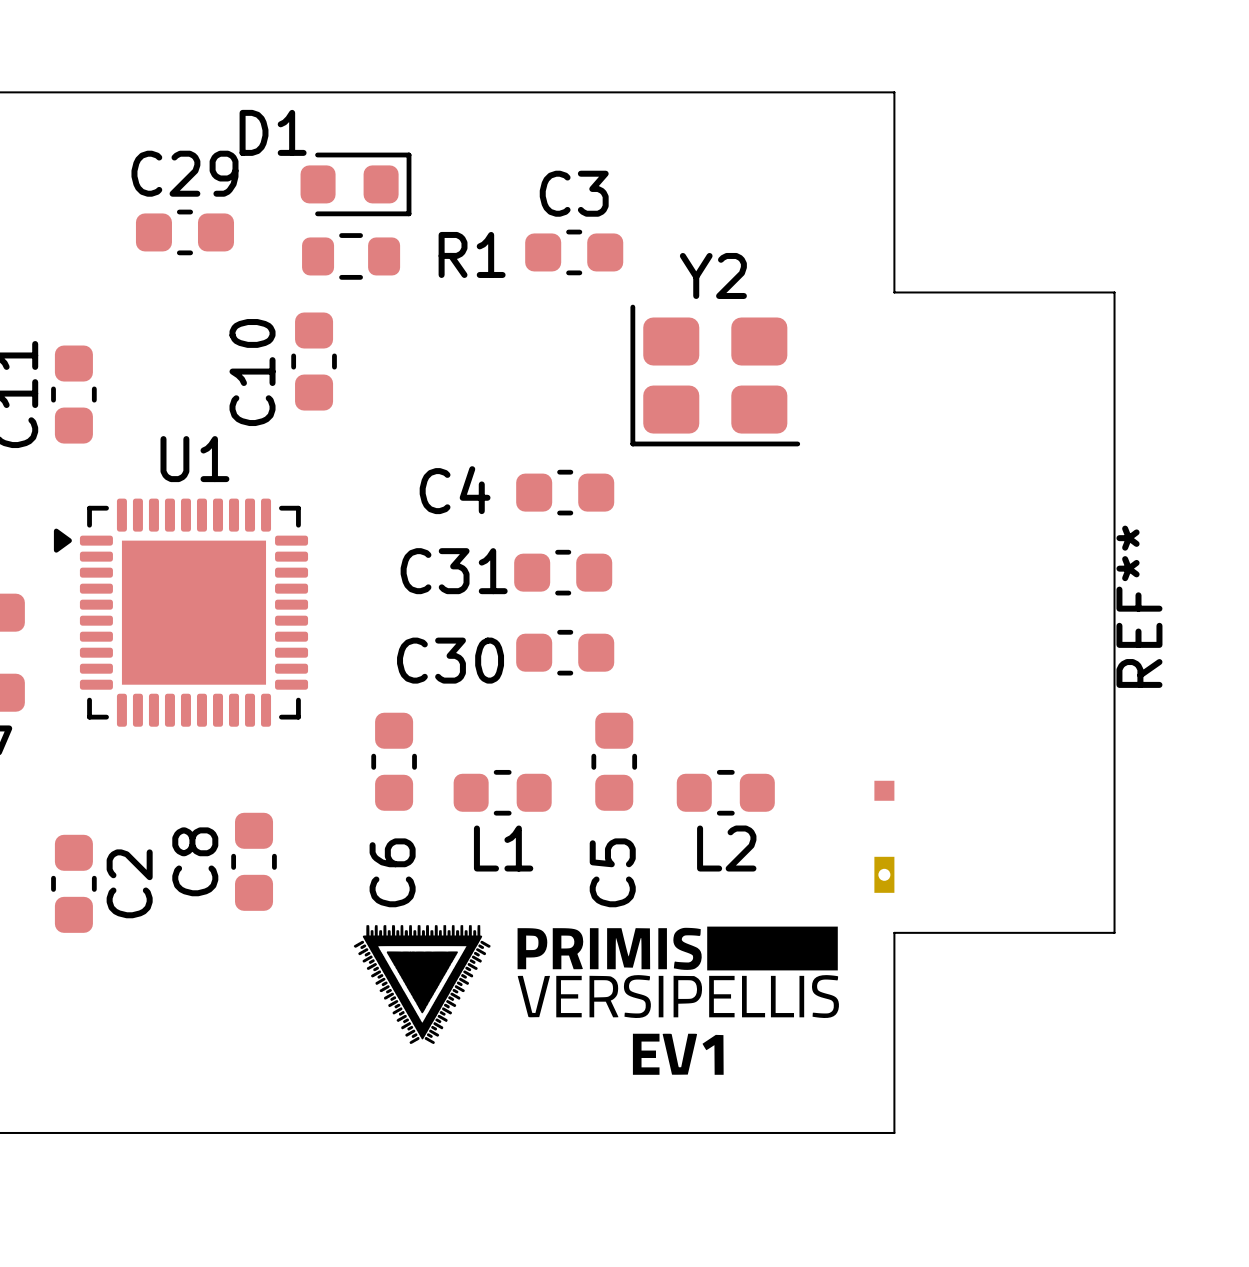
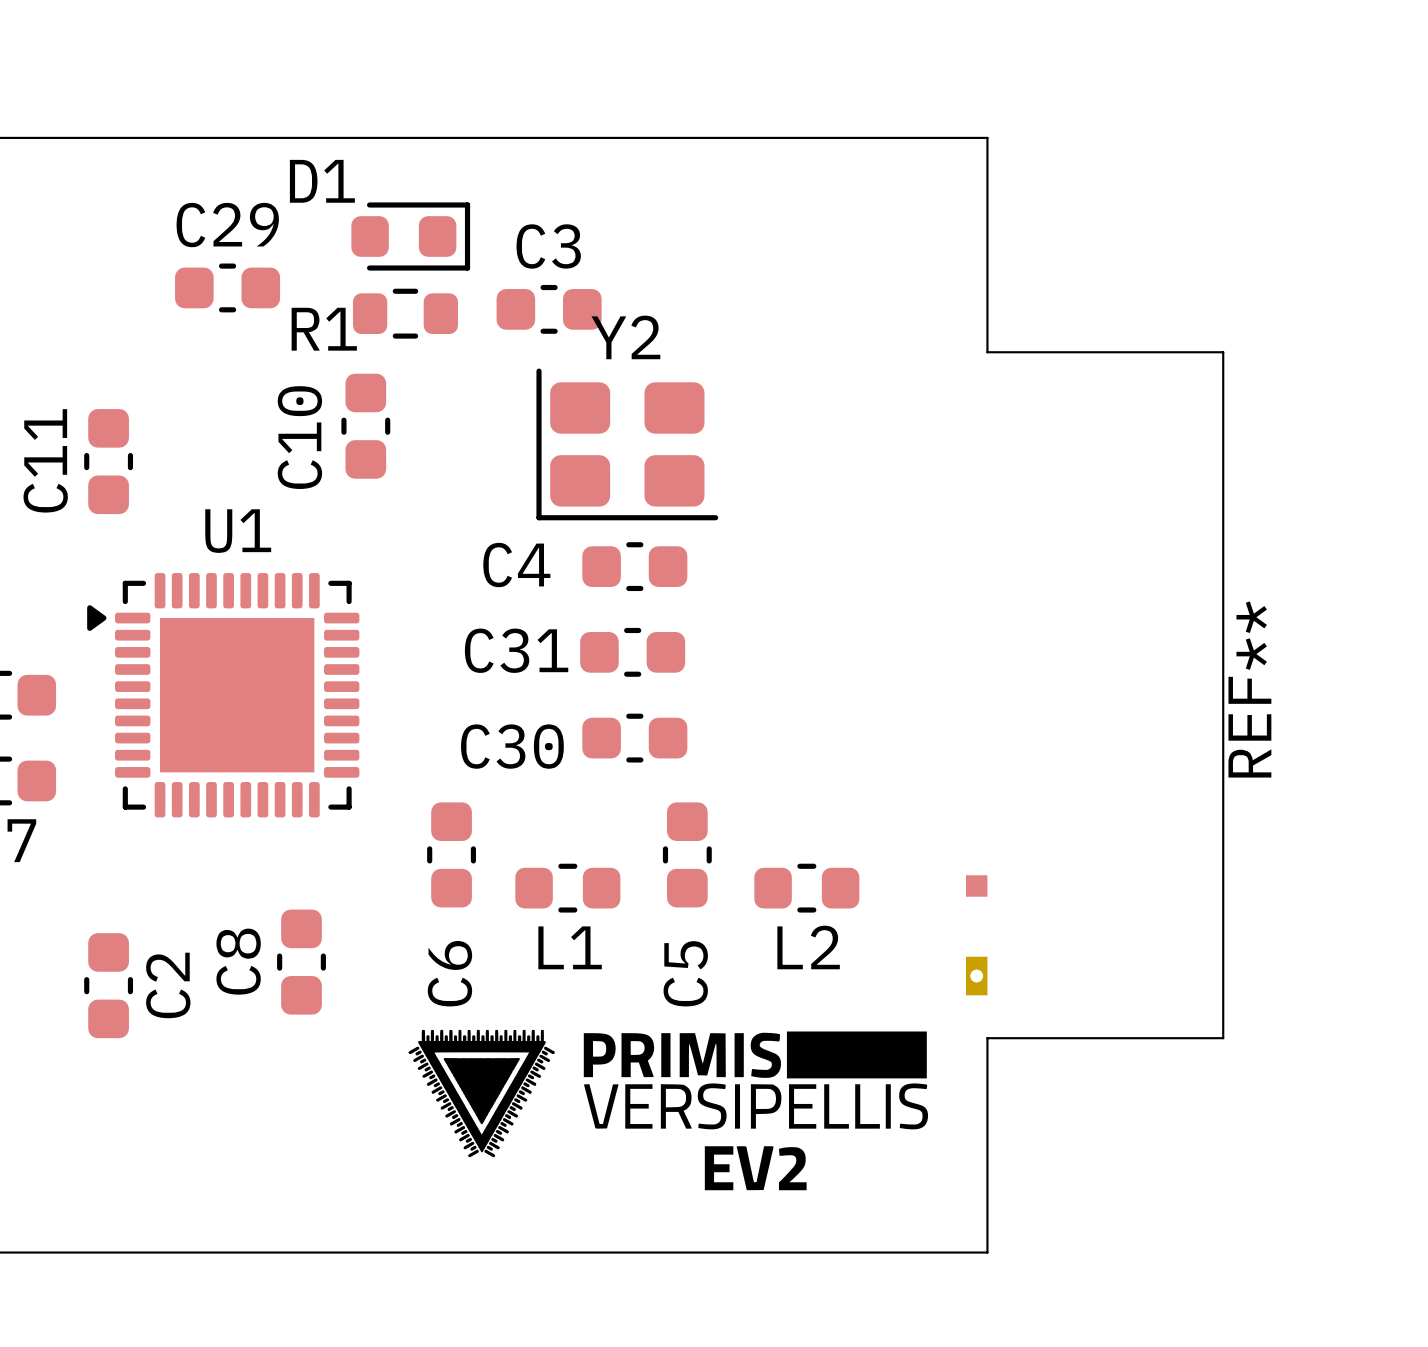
C3 position: (574, 252) -> (549, 309)
R1 name position: R1 (472, 254) -> R1 (324, 329)
Y2 position: (715, 375) -> (627, 444)
drawing shape: [517, 926, 839, 1075] -> [583, 1031, 929, 1191]

